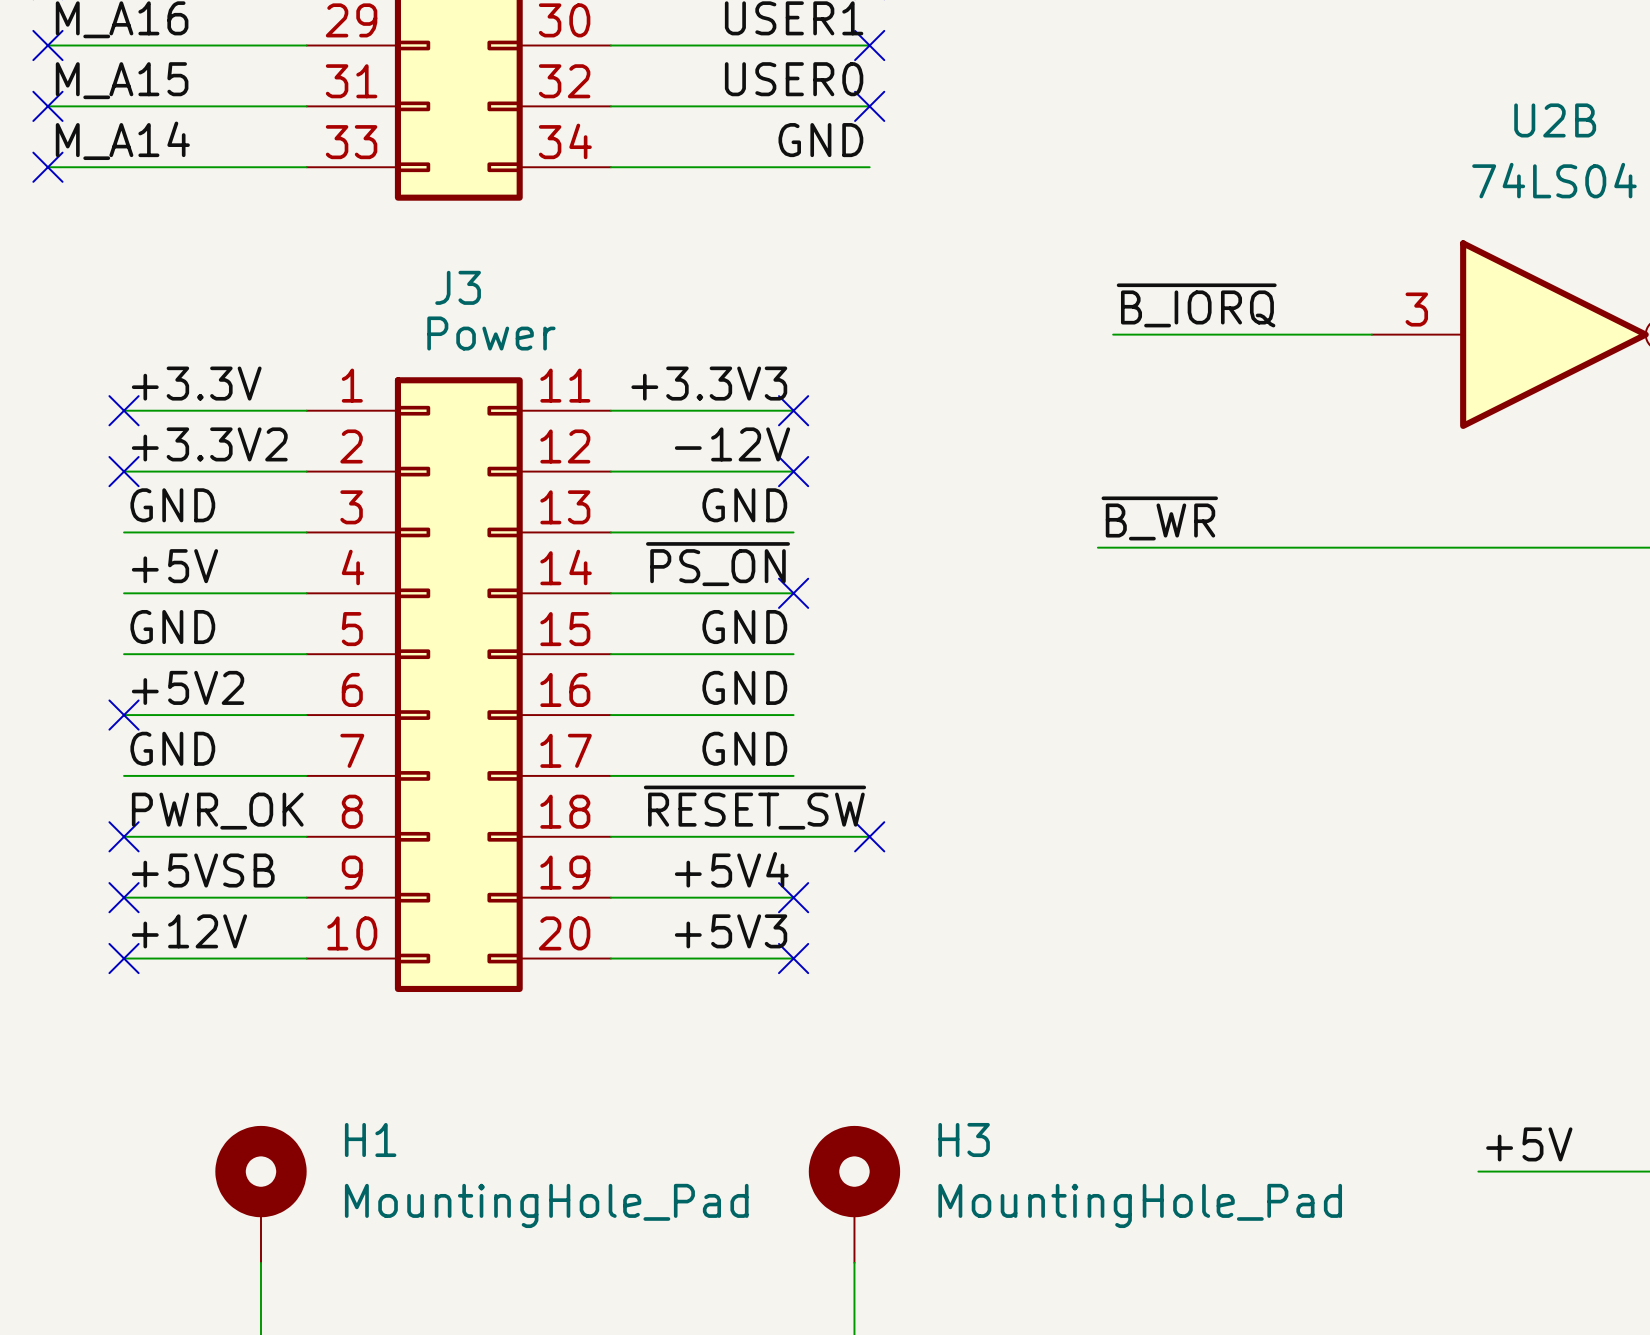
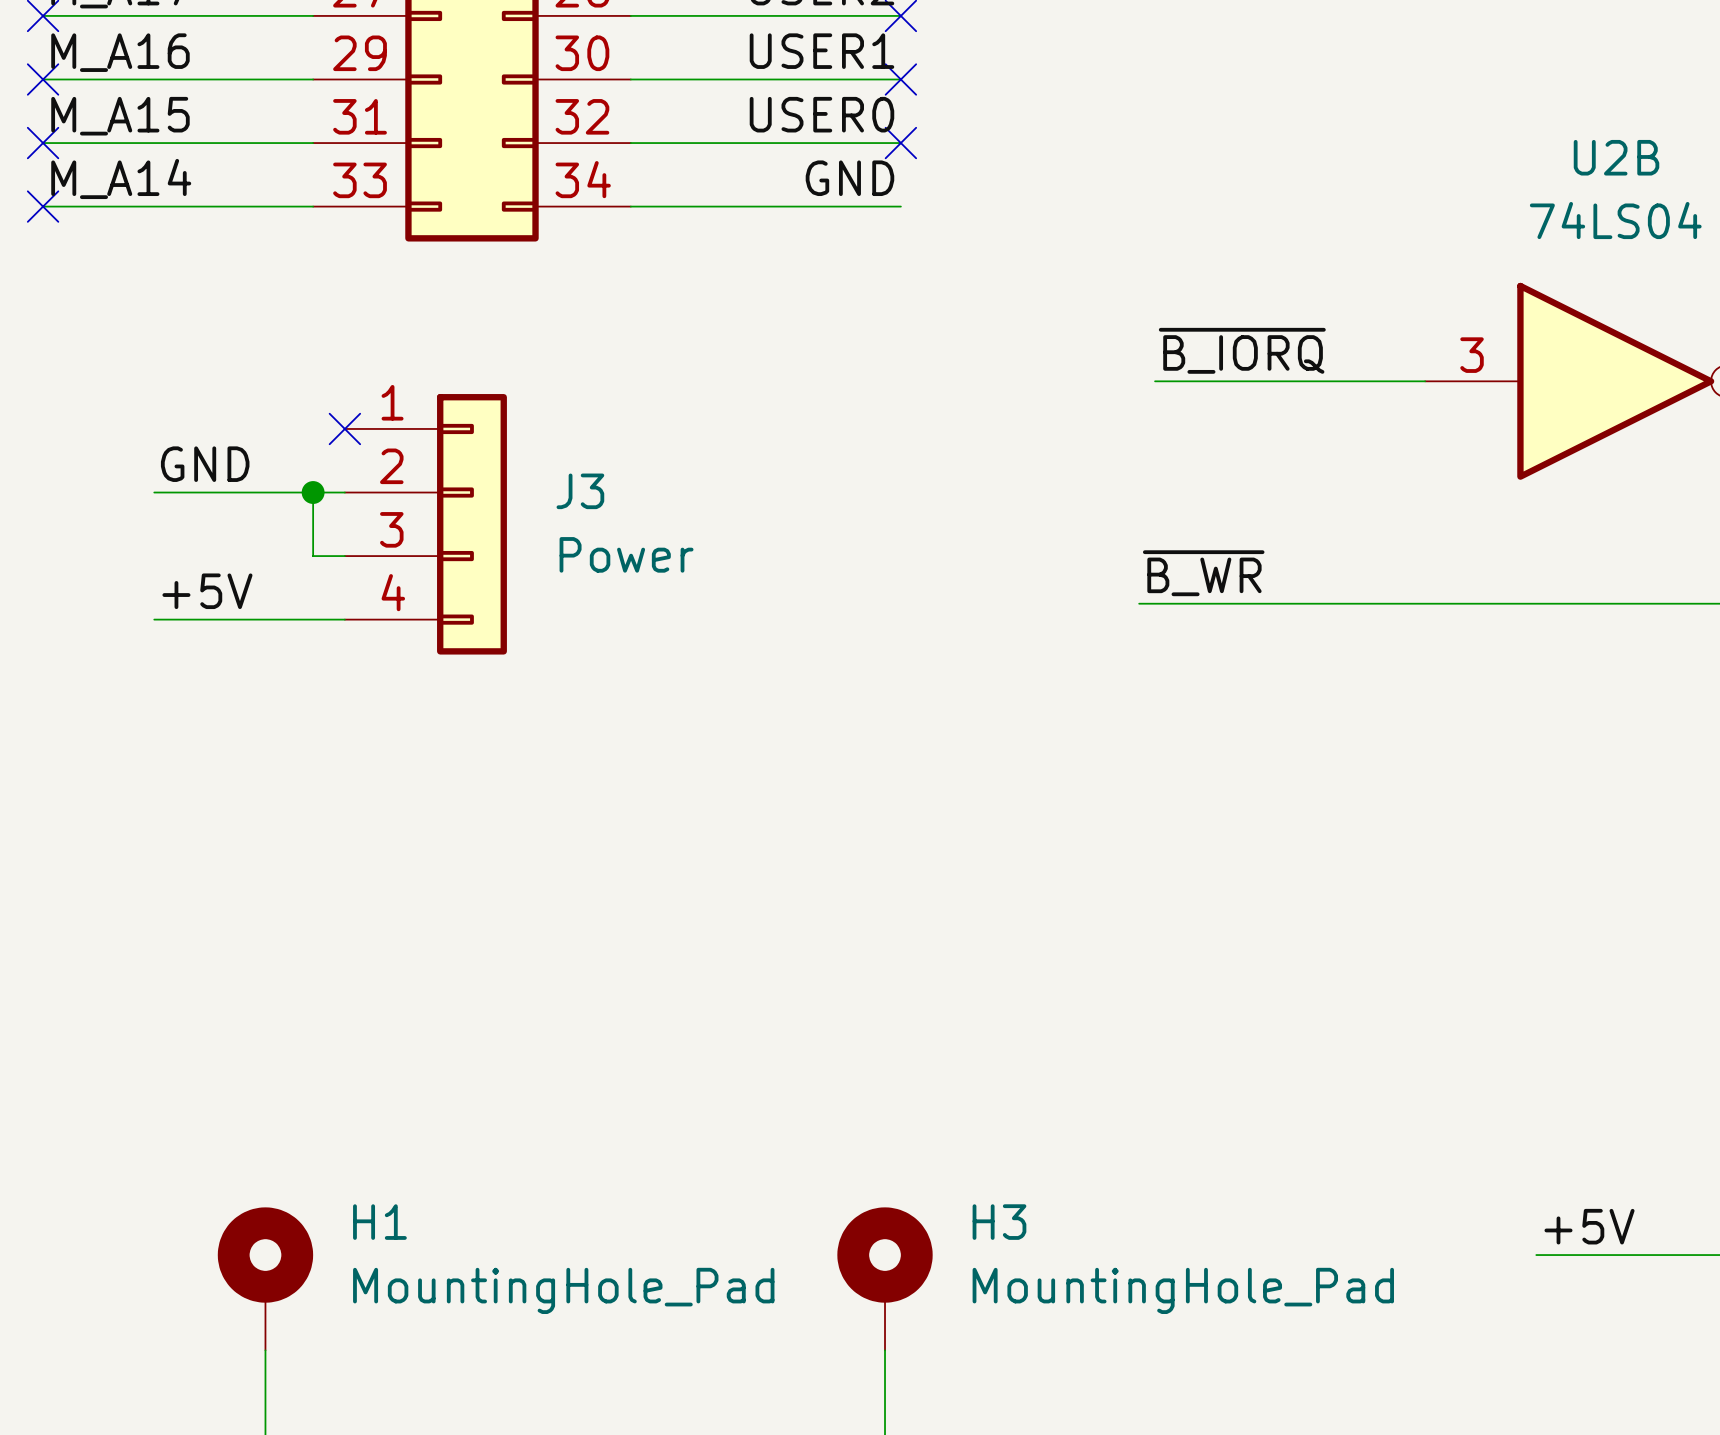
J3 name position: J3 (458, 287) -> J3 (580, 491)
J3 value position: Power (491, 333) -> Power (626, 554)
J3 symbol: [306, 377, 611, 993] -> [344, 394, 507, 655]
no-connect mark: none -> (344, 428)
label: +3.3V (196, 383) -> none
label: +3.3V3 (709, 383) -> none
wire: (124, 410) (306, 410) -> (154, 492) (344, 492)
no-connect mark: (124, 410) -> none
wire: (610, 410) (793, 410) -> none
no-connect mark: (793, 410) -> none
wire: none -> (313, 492) (313, 556) (344, 556)
junction: none -> (313, 492)
label: +3.3V2 (209, 444) -> none
label: -12V (732, 444) -> none
wire: (124, 471) (306, 471) -> none
no-connect mark: (124, 471) -> none
wire: (610, 471) (793, 471) -> none
no-connect mark: (793, 471) -> none
label position: GND (172, 505) -> GND (205, 464)
label: GND (744, 505) -> none
wire: (124, 532) (306, 532) -> (154, 619) (344, 619)
wire: (610, 532) (793, 532) -> none
label: ~{PS_ON} (718, 564) -> none
label position: +5V (174, 566) -> +5V (207, 591)
wire: (124, 593) (306, 593) -> none
wire: (610, 593) (793, 593) -> none
no-connect mark: (793, 593) -> none
label: GND (172, 627) -> none
label: GND (744, 627) -> none
wire: (124, 654) (306, 654) -> none
wire: (610, 654) (793, 654) -> none
label: +5V2 (188, 687) -> none
label: GND (744, 687) -> none
wire: (124, 715) (306, 715) -> none
no-connect mark: (124, 715) -> none
wire: (610, 715) (793, 715) -> none
label: GND (172, 748) -> none
label: GND (744, 748) -> none
wire: (124, 775) (306, 775) -> none
wire: (610, 775) (793, 775) -> none
label: ~{RESET_SW} (754, 807) -> none
label: PWR_OK (217, 811) -> none
wire: (124, 836) (306, 836) -> none
no-connect mark: (124, 836) -> none
wire: (610, 836) (869, 836) -> none
no-connect mark: (869, 836) -> none
label: +5V4 (731, 869) -> none
label: +5VSB (203, 870) -> none
wire: (124, 897) (306, 897) -> none
no-connect mark: (124, 897) -> none
wire: (610, 897) (793, 897) -> none
no-connect mark: (793, 897) -> none
label: +12V (189, 931) -> none
label: +5V3 (731, 931) -> none
wire: (124, 958) (306, 958) -> none
no-connect mark: (124, 958) -> none
wire: (610, 958) (793, 958) -> none
no-connect mark: (793, 958) -> none

